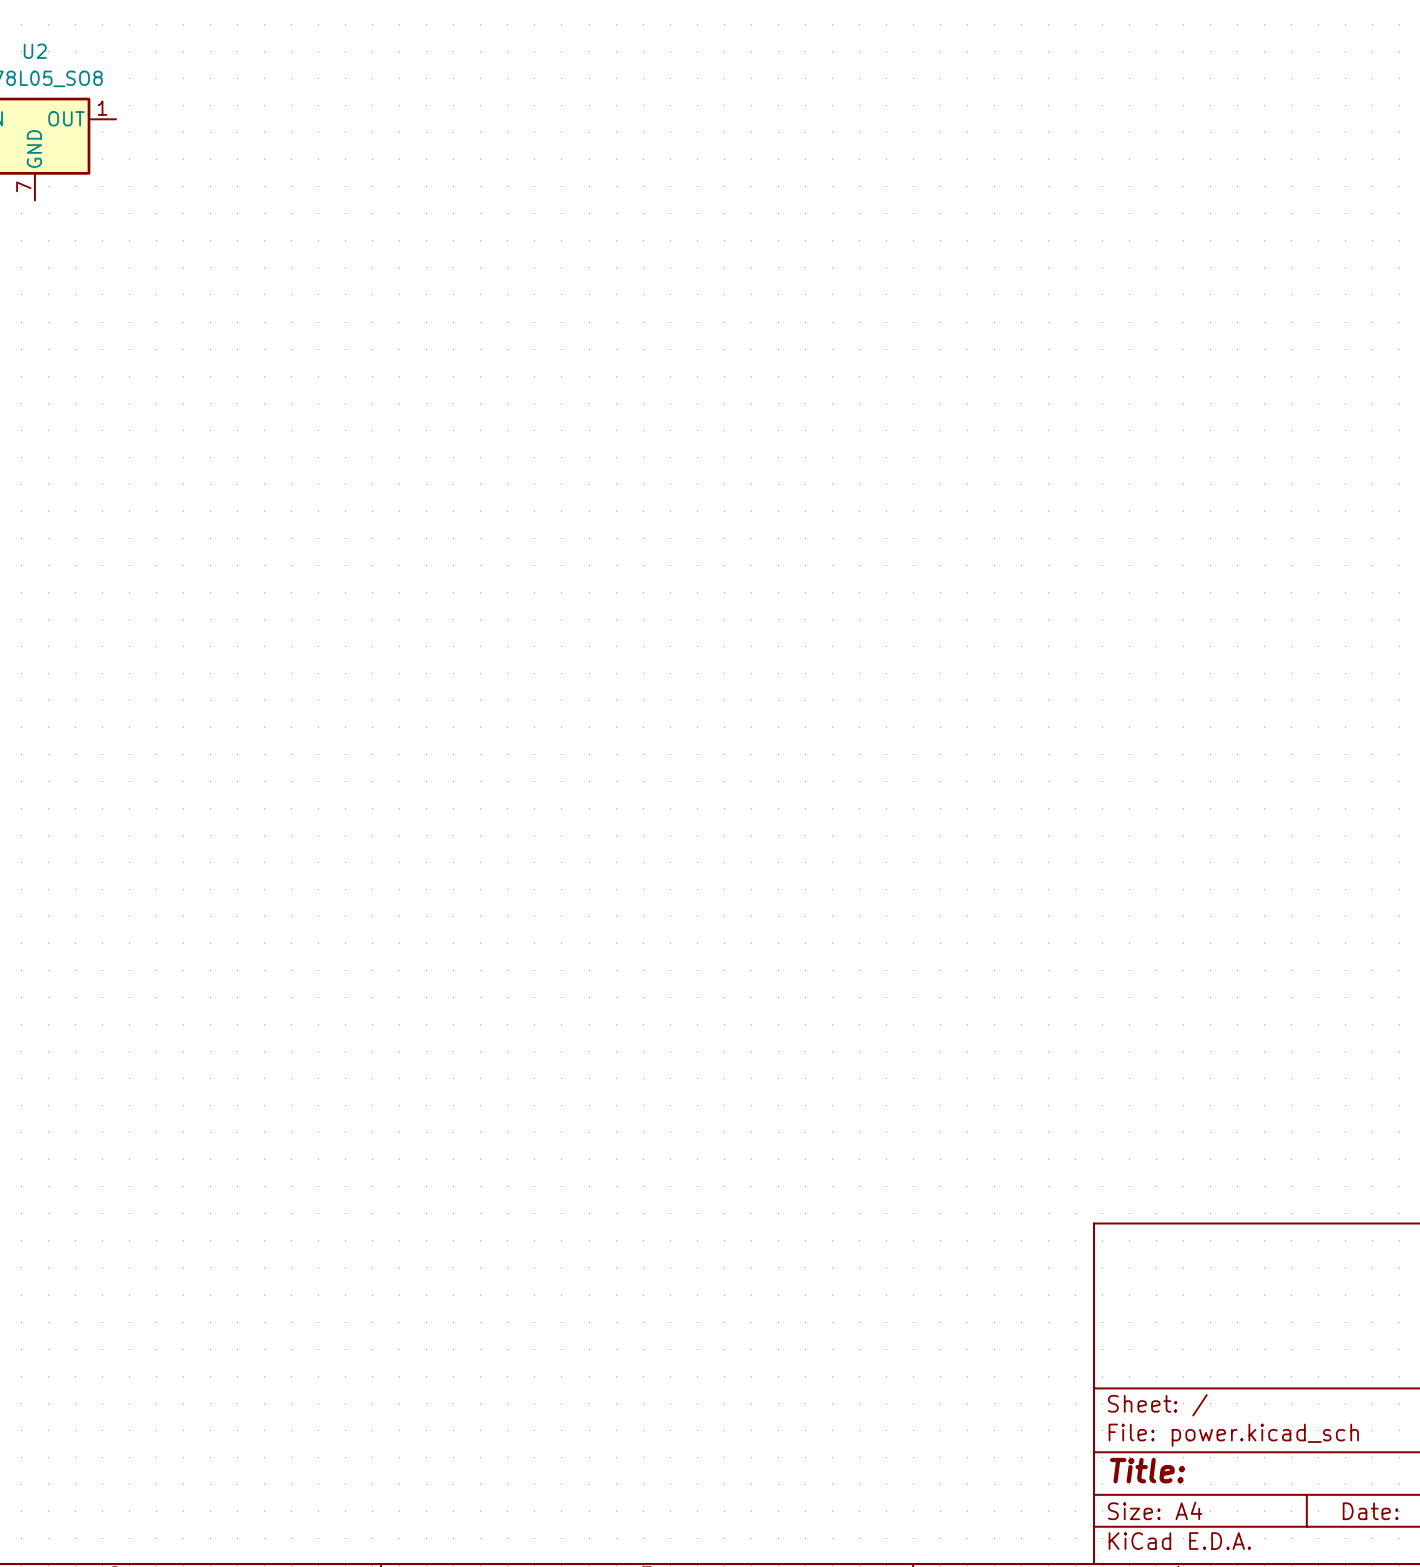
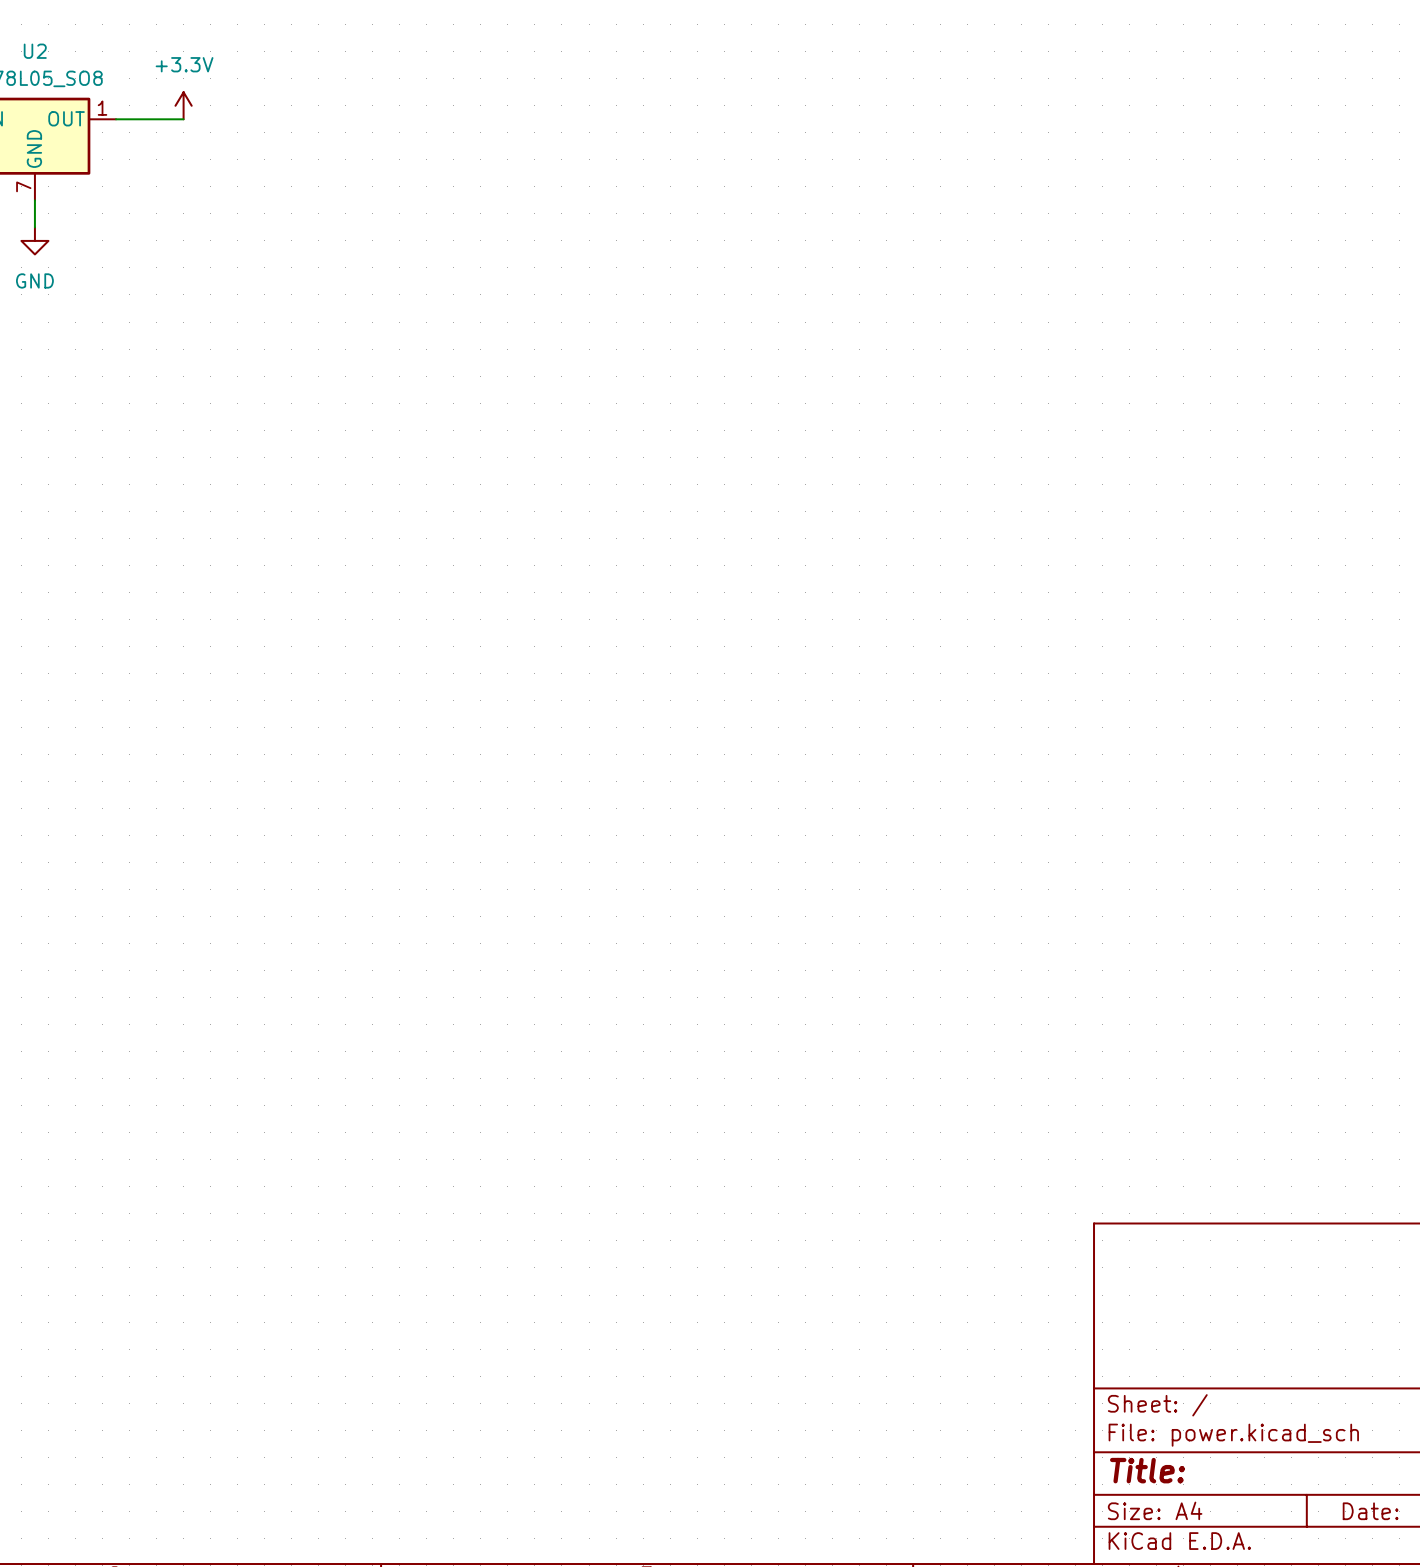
power symbol: none -> +3.3V (183, 105)
wire: none -> (116, 119) (183, 119)
wire: none -> (34, 200) (34, 227)
power symbol: none -> GND (34, 240)

